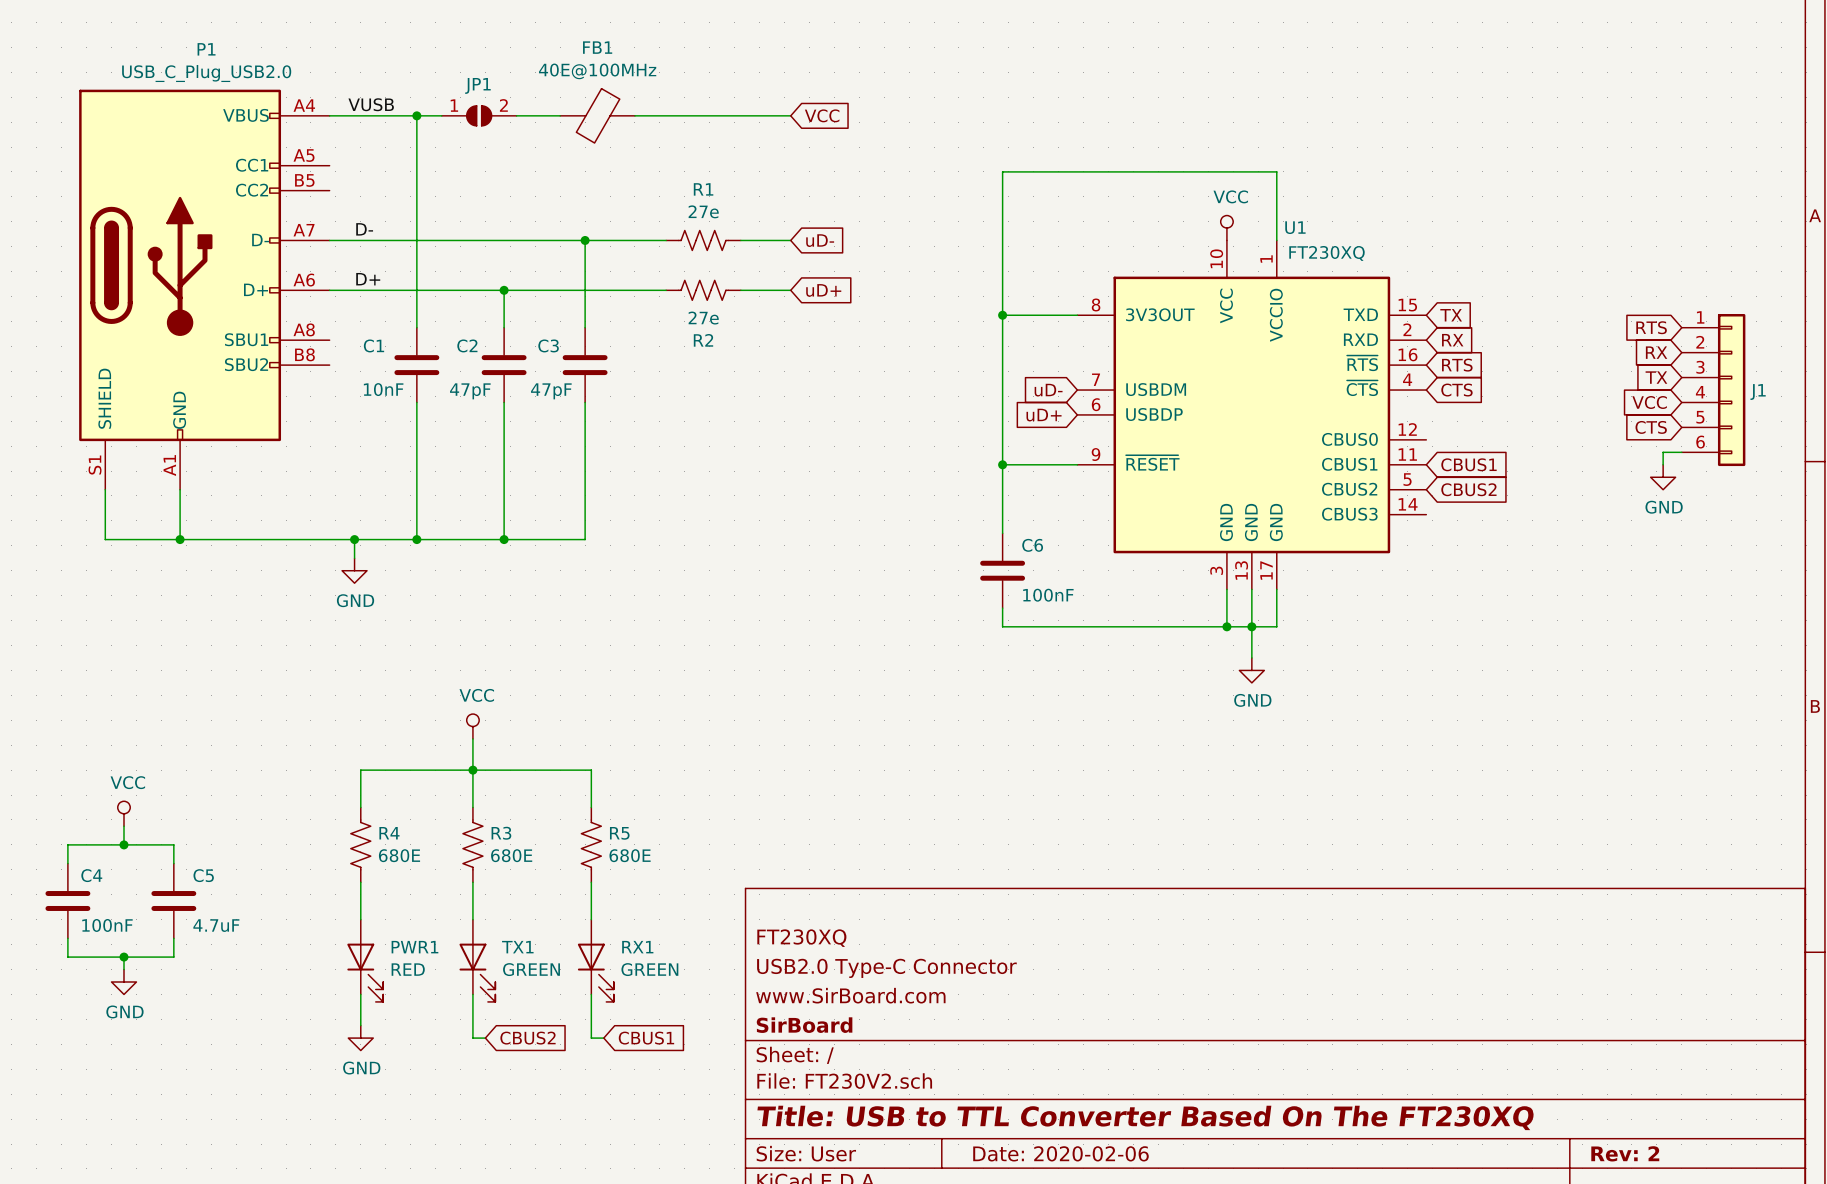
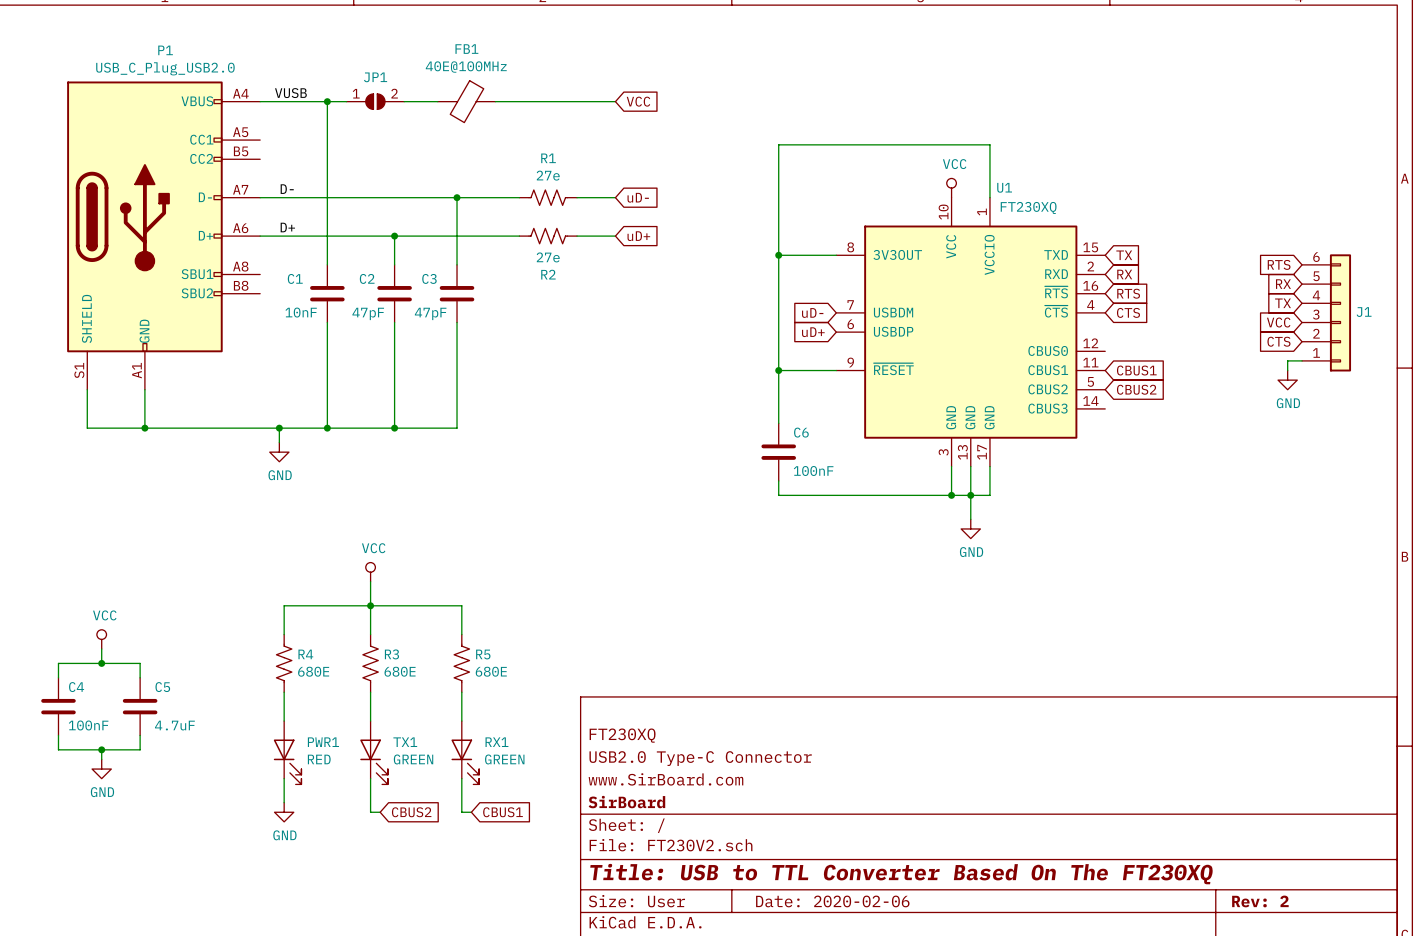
J1 flip: as is (1731, 390) -> up-down (1340, 312)

